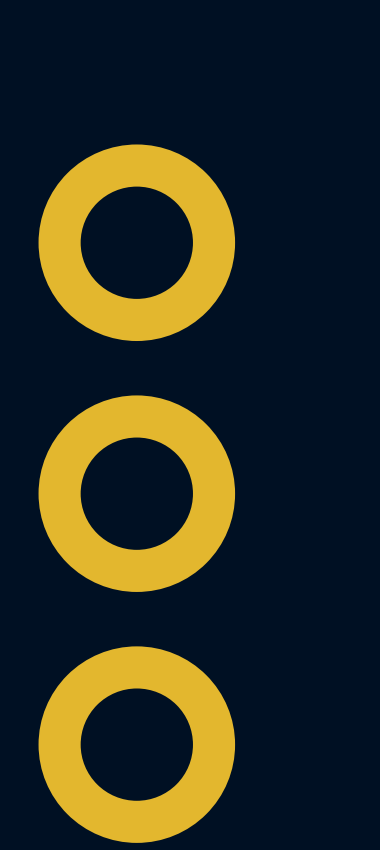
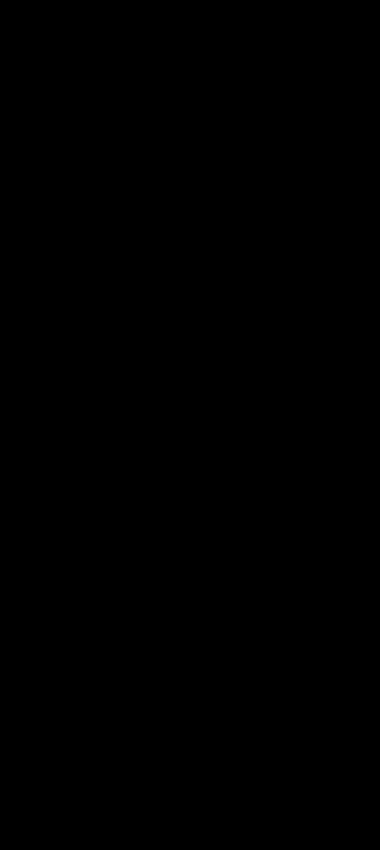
part: (136, 242) -> none
part: (136, 493) -> none
part: (136, 744) -> none

